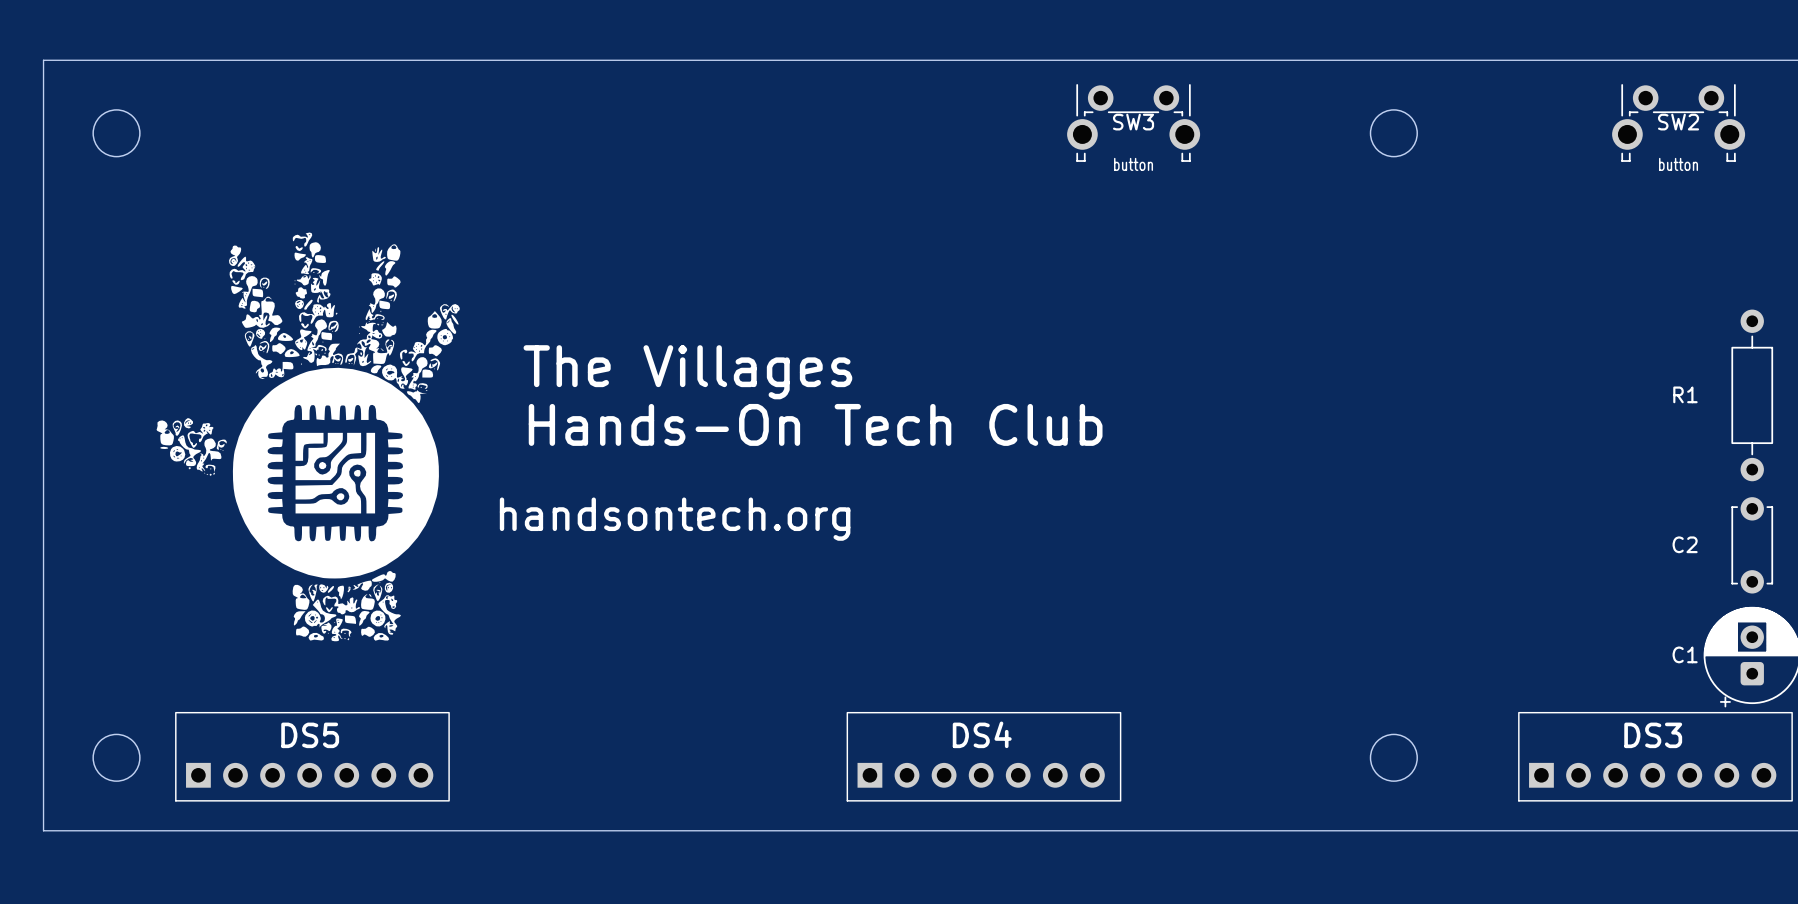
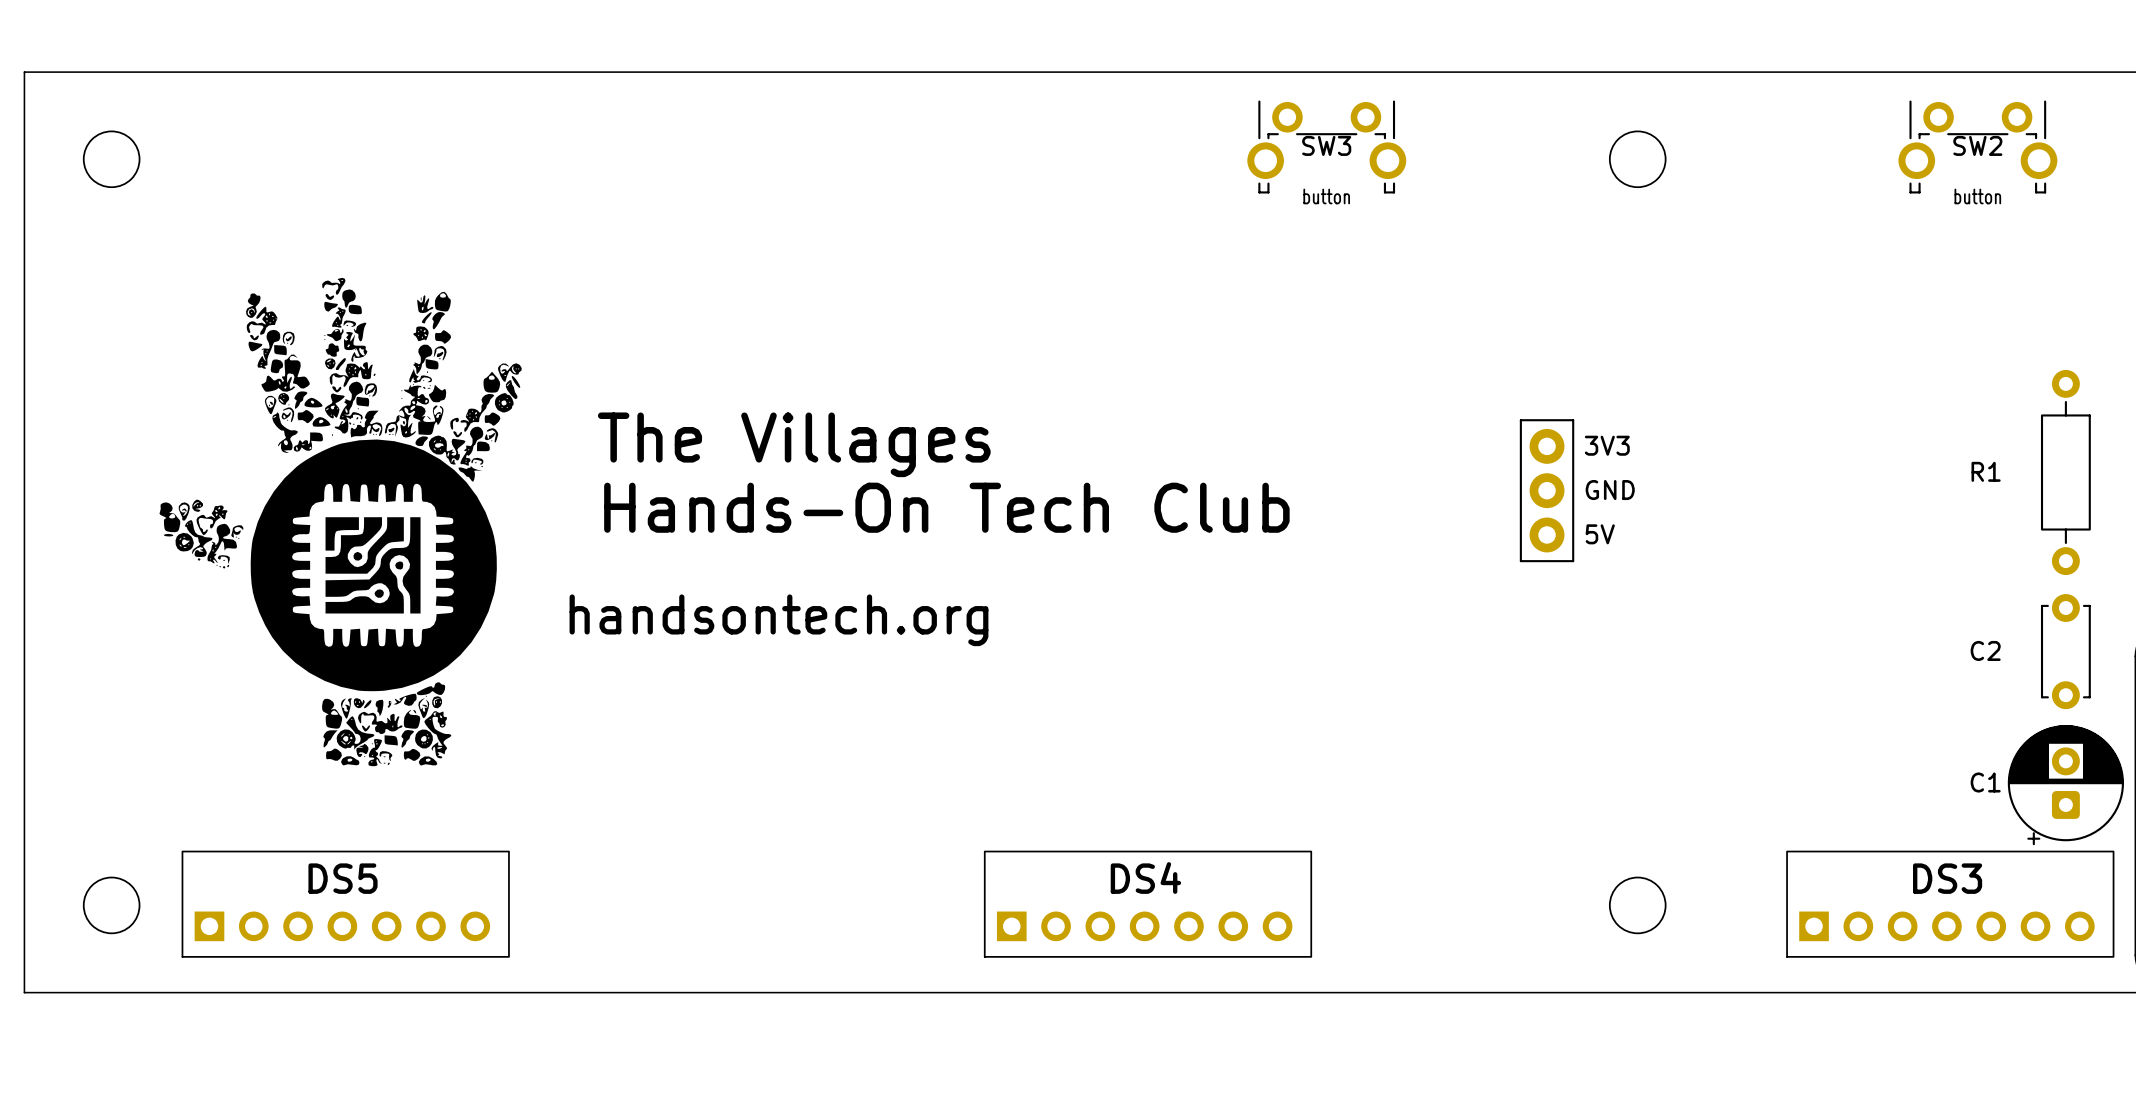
line: none -> (1573, 420) (1520, 420) (1520, 561) (1573, 561) (1573, 420)
part: none -> (1547, 446)
text: none -> 3V3 (1607, 445)
part: none -> (1547, 490)
text: none -> GND (1610, 490)
part: none -> (1547, 534)
text: none -> 5V (1600, 534)

